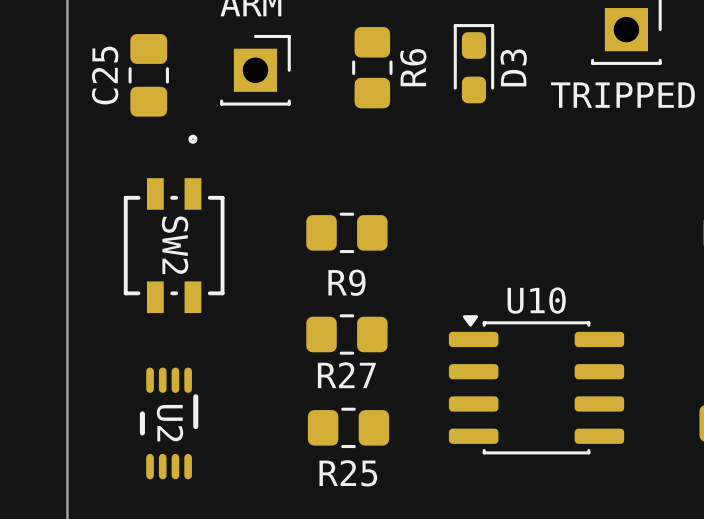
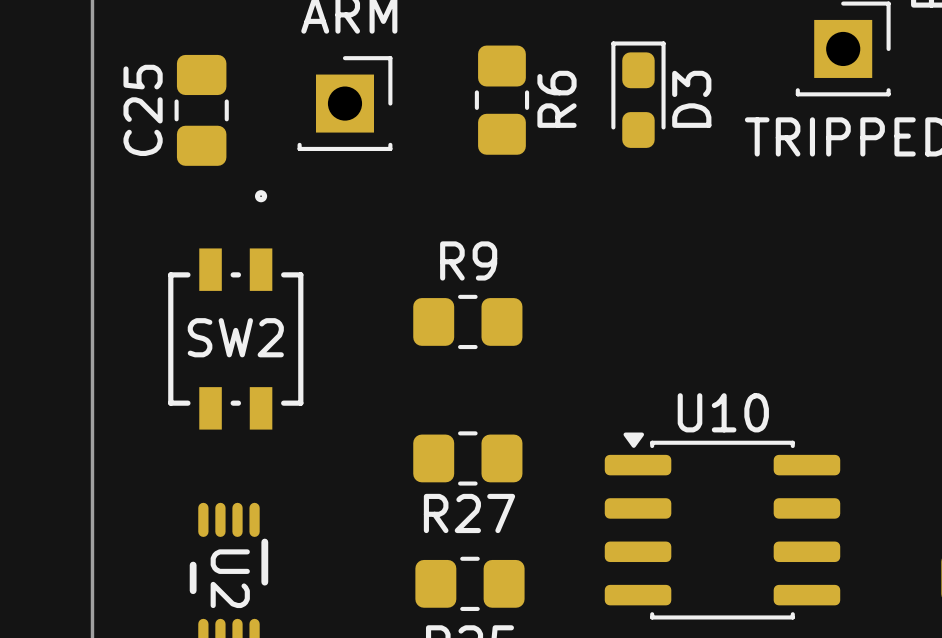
SW2 name rotation: 0° (175, 245) -> 90° counterclockwise (235, 337)
R9 name position: R9 (346, 282) -> R9 (468, 260)

